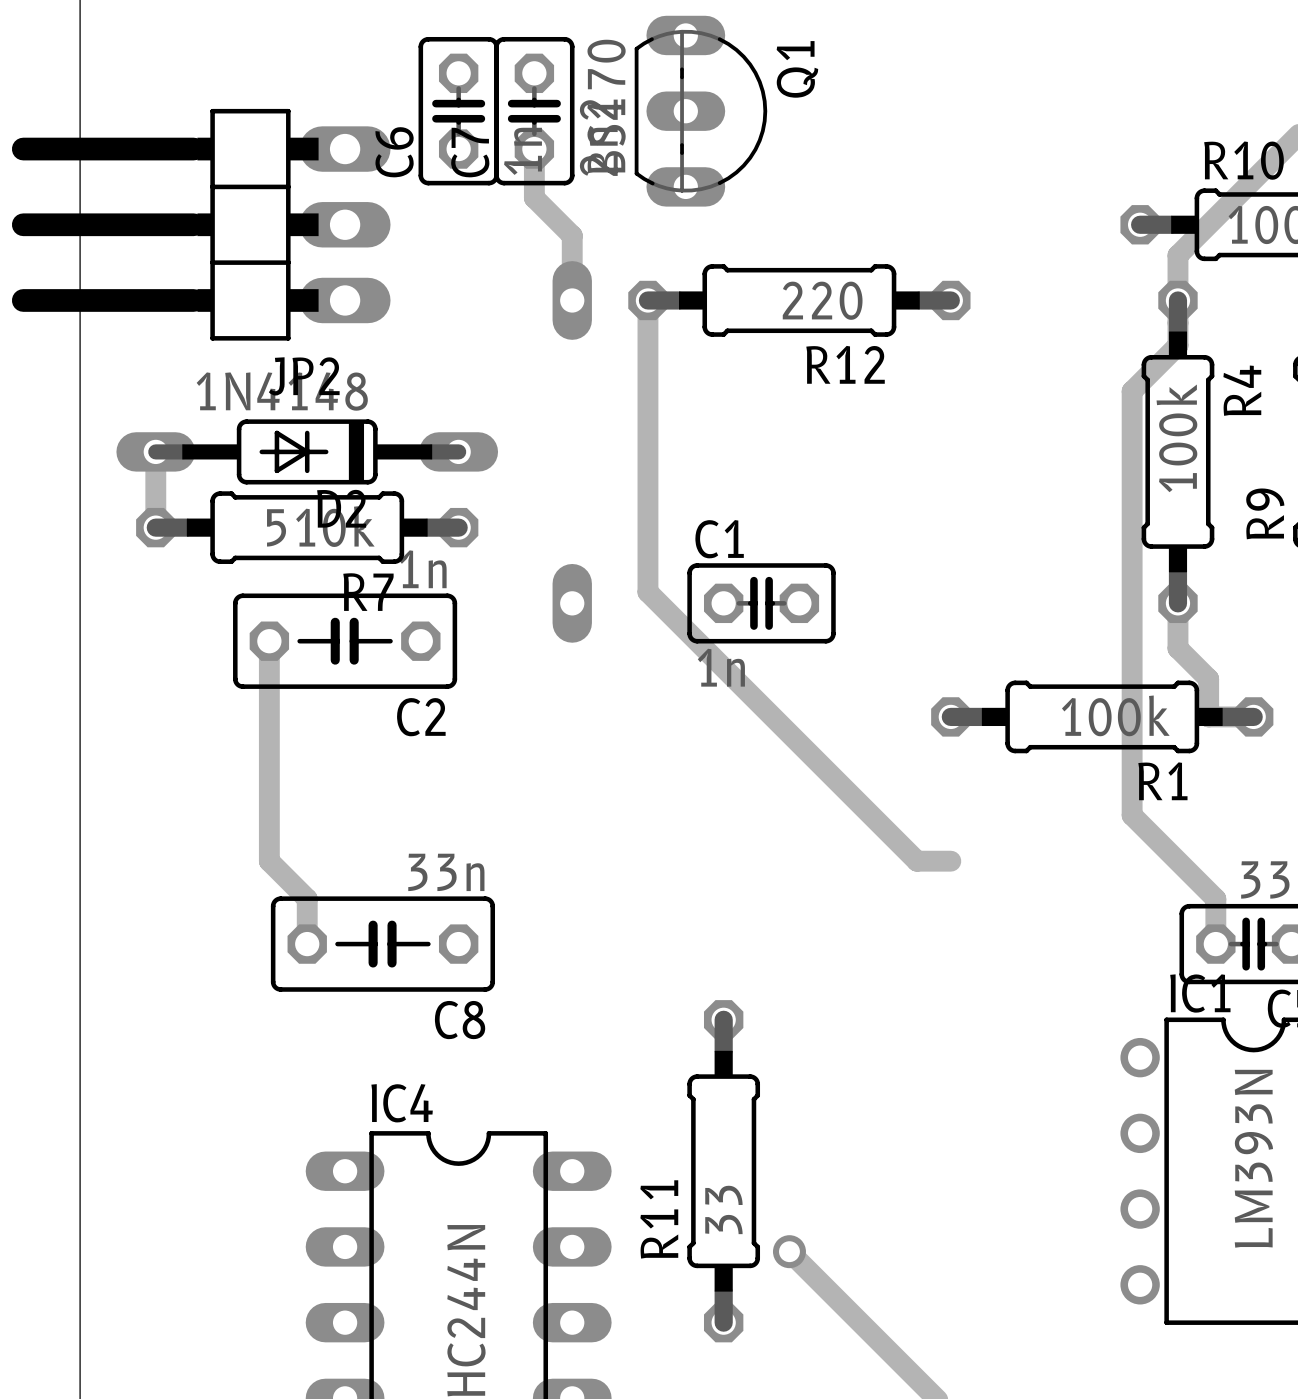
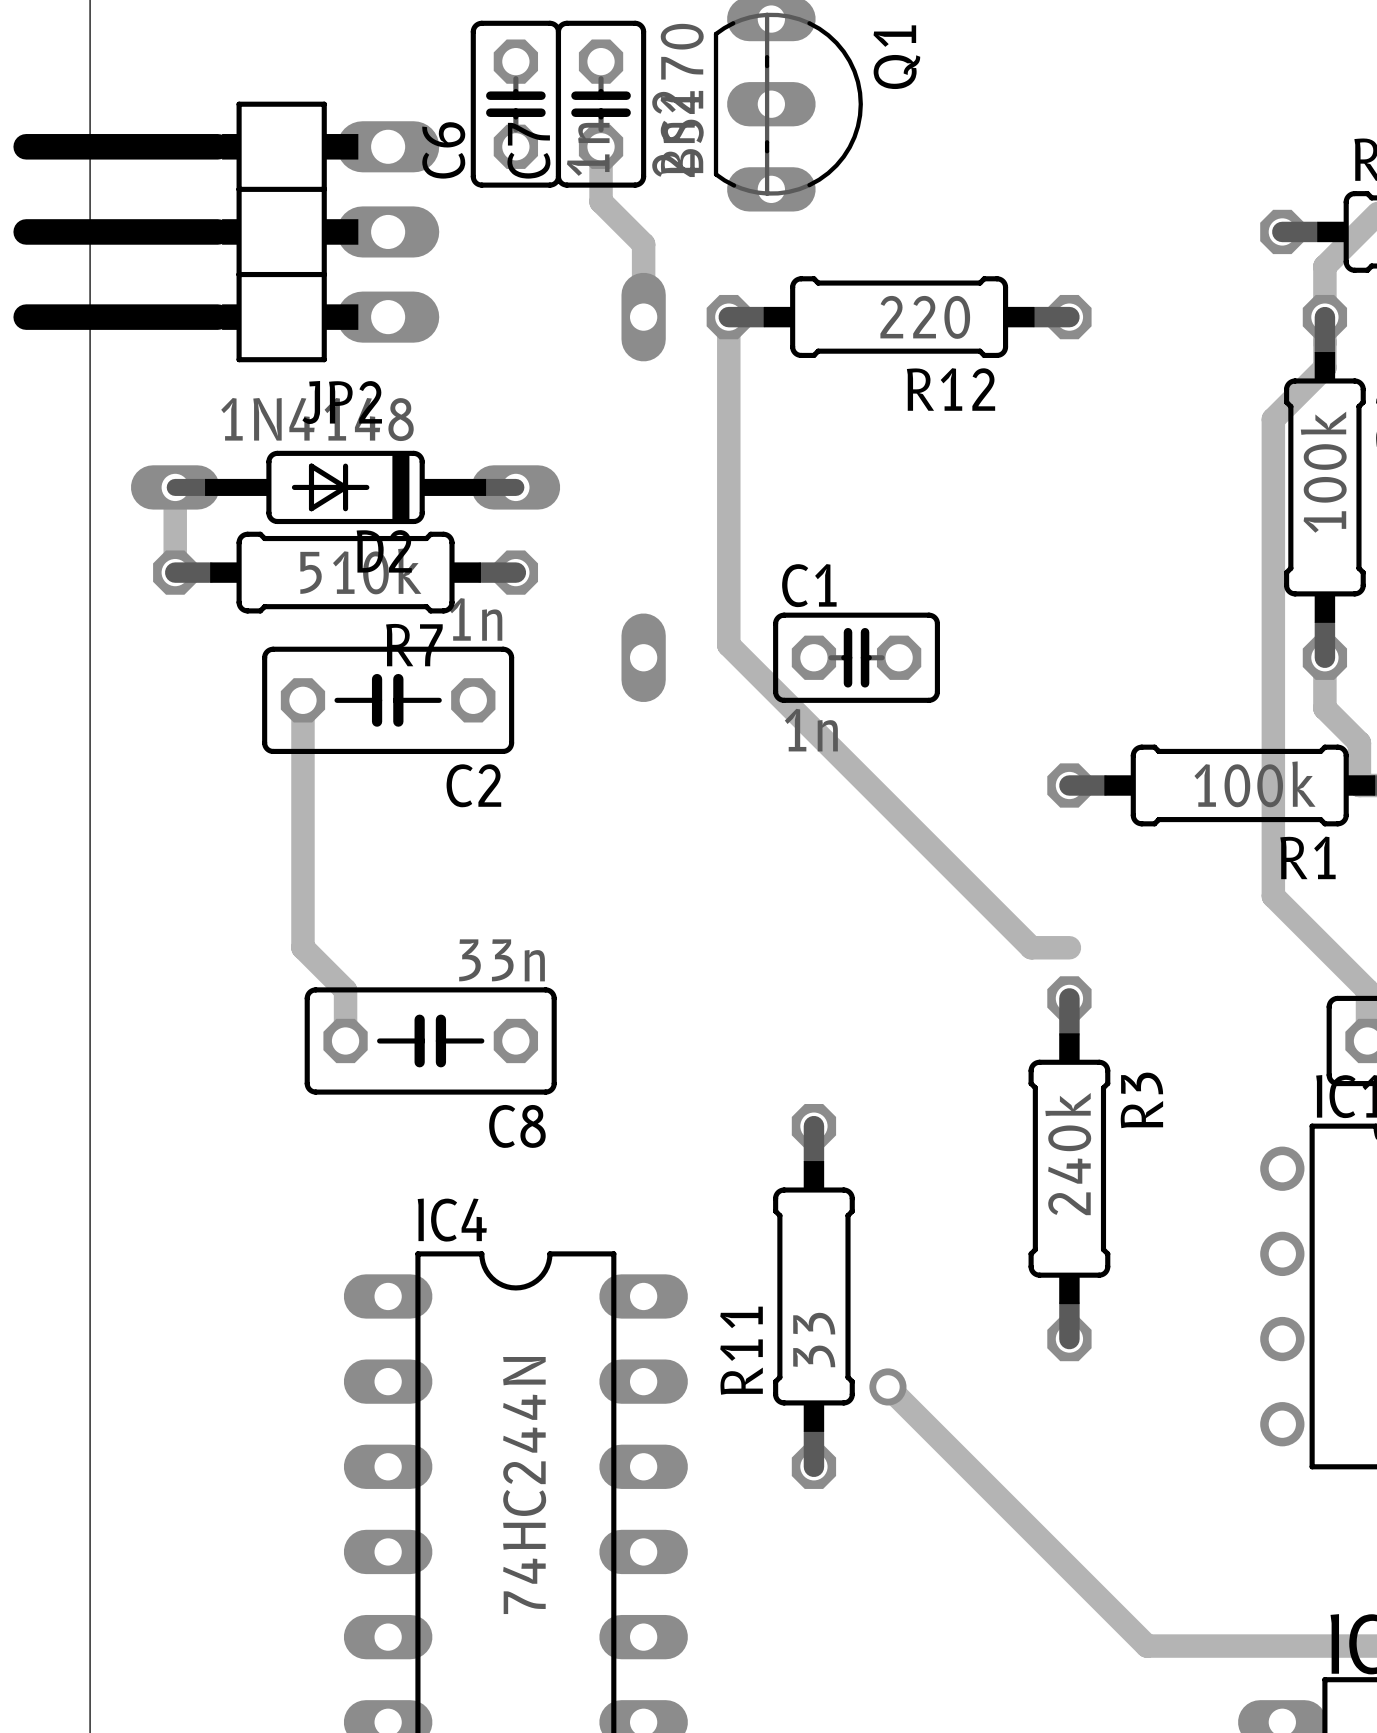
R3: none -> 240k (1069, 1168)

